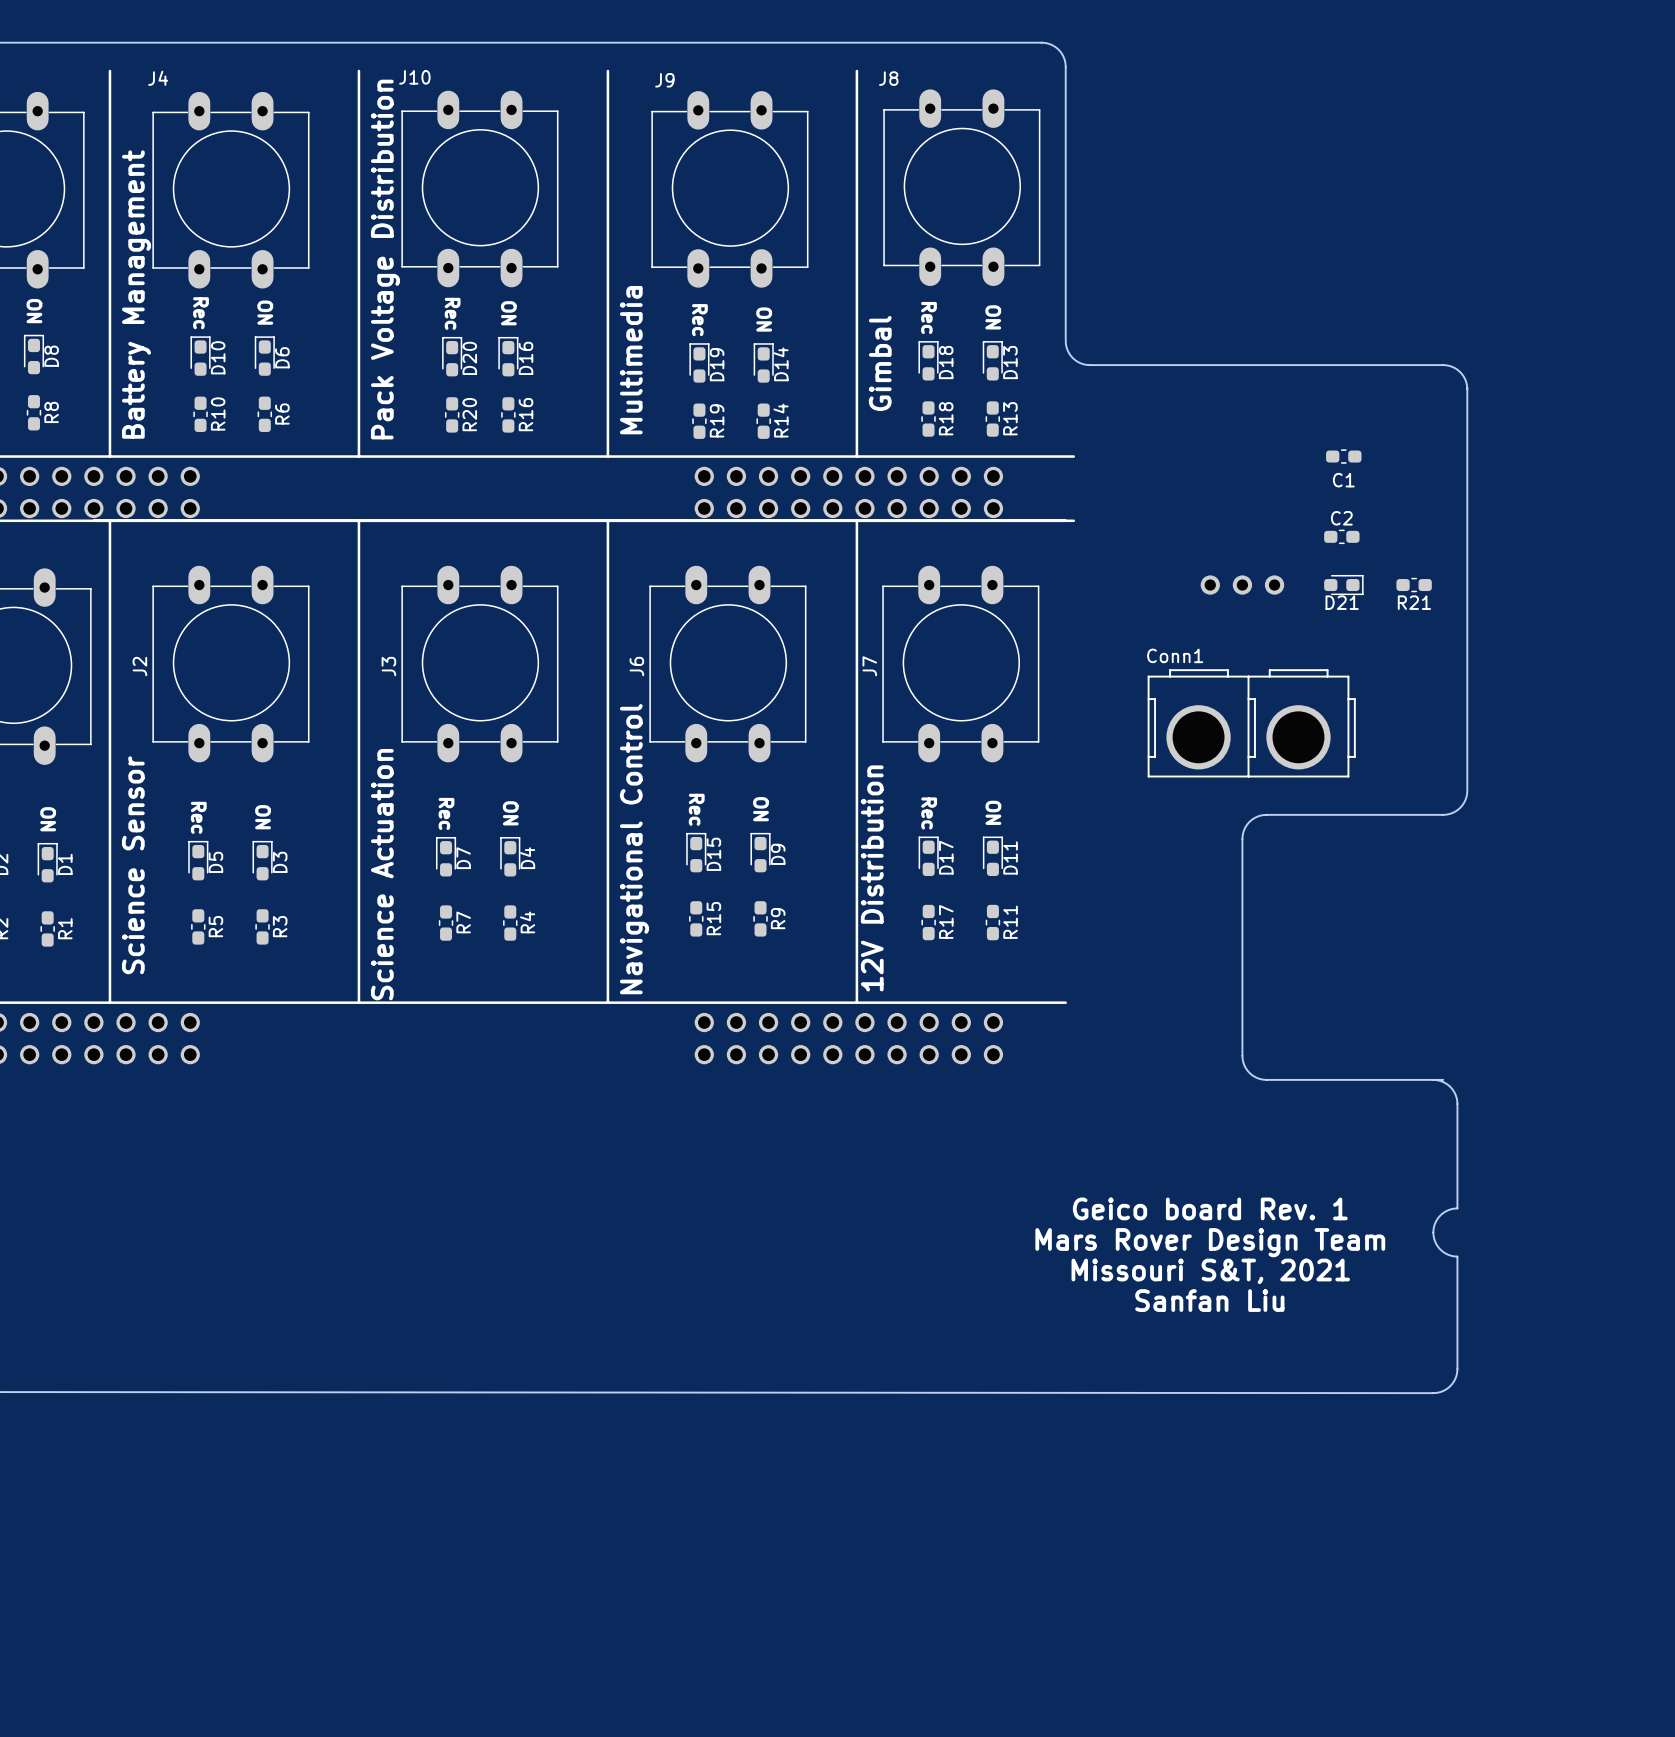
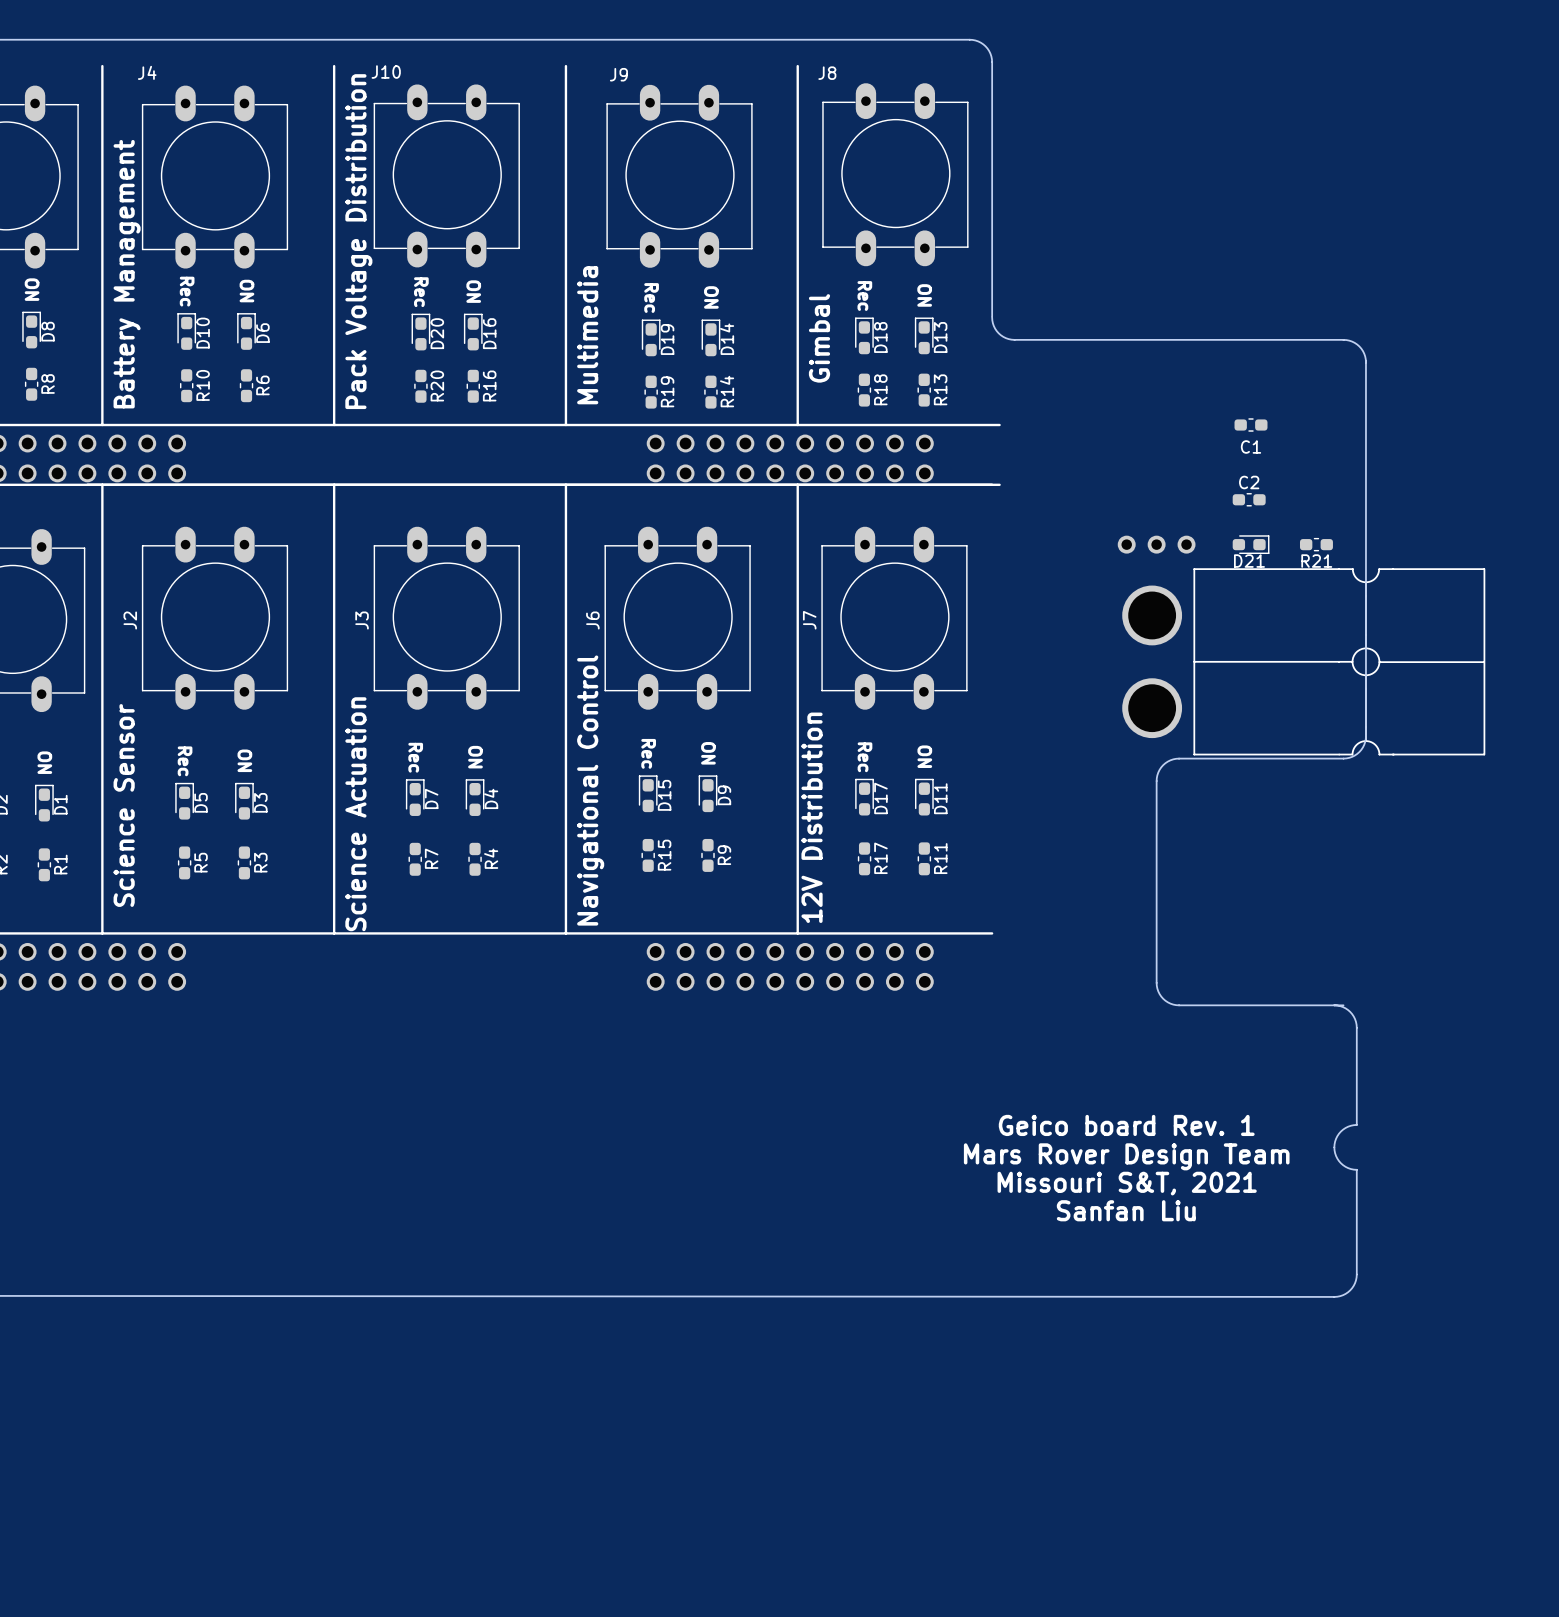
part: none -> (1303, 661)
Conn1: (1251, 723) -> none

